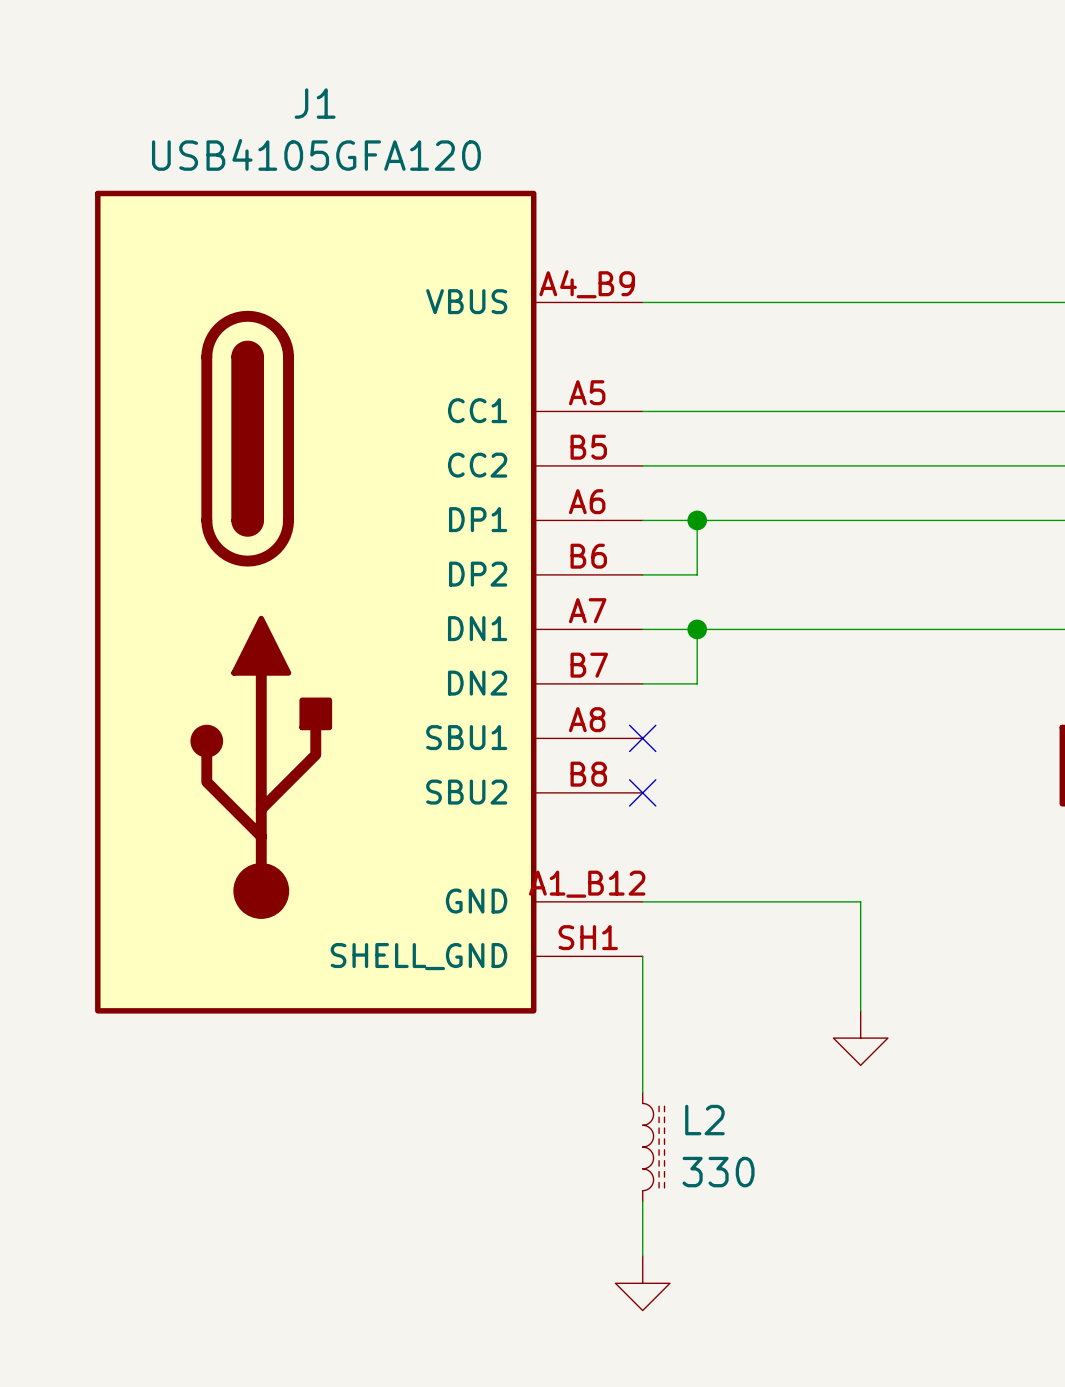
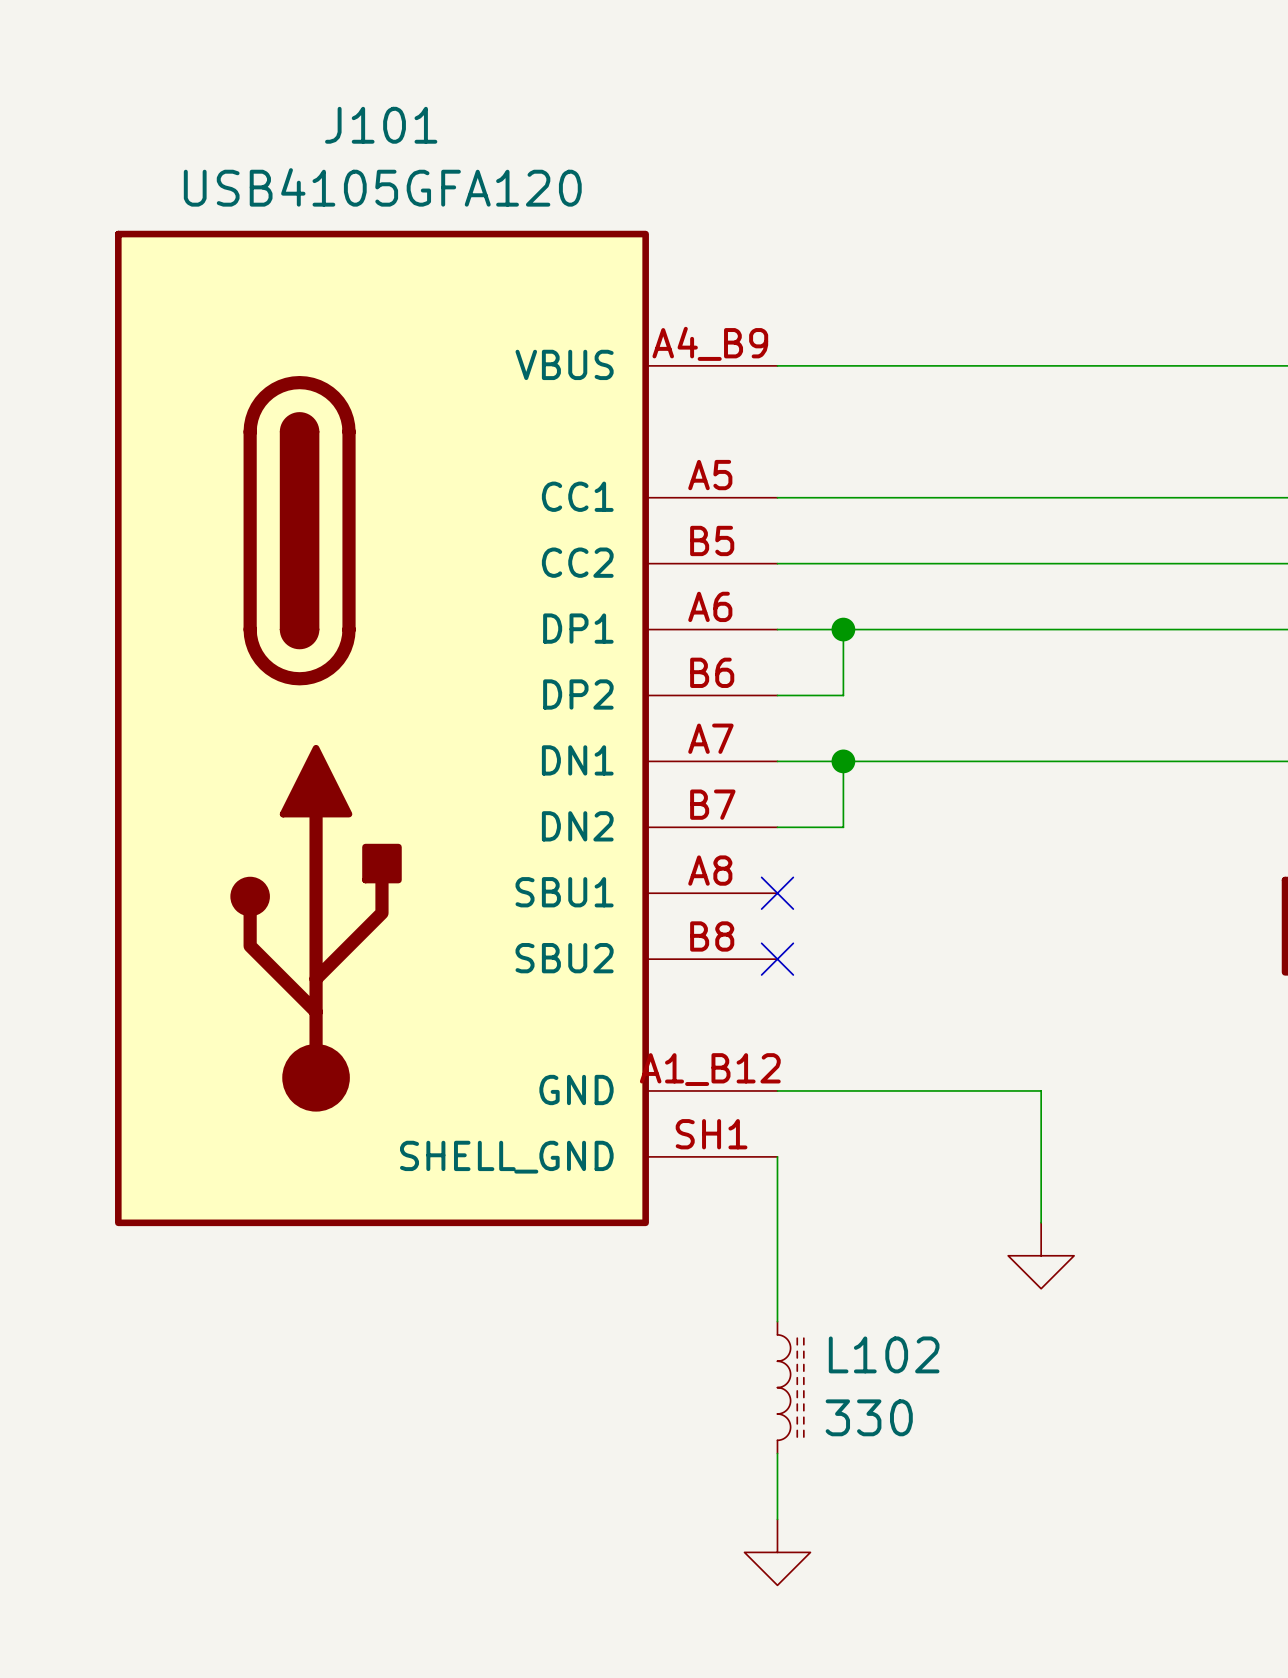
J1 name: J1 (315, 103) -> J101 (381, 125)
L2 name: L2 (704, 1120) -> L102 (884, 1354)

